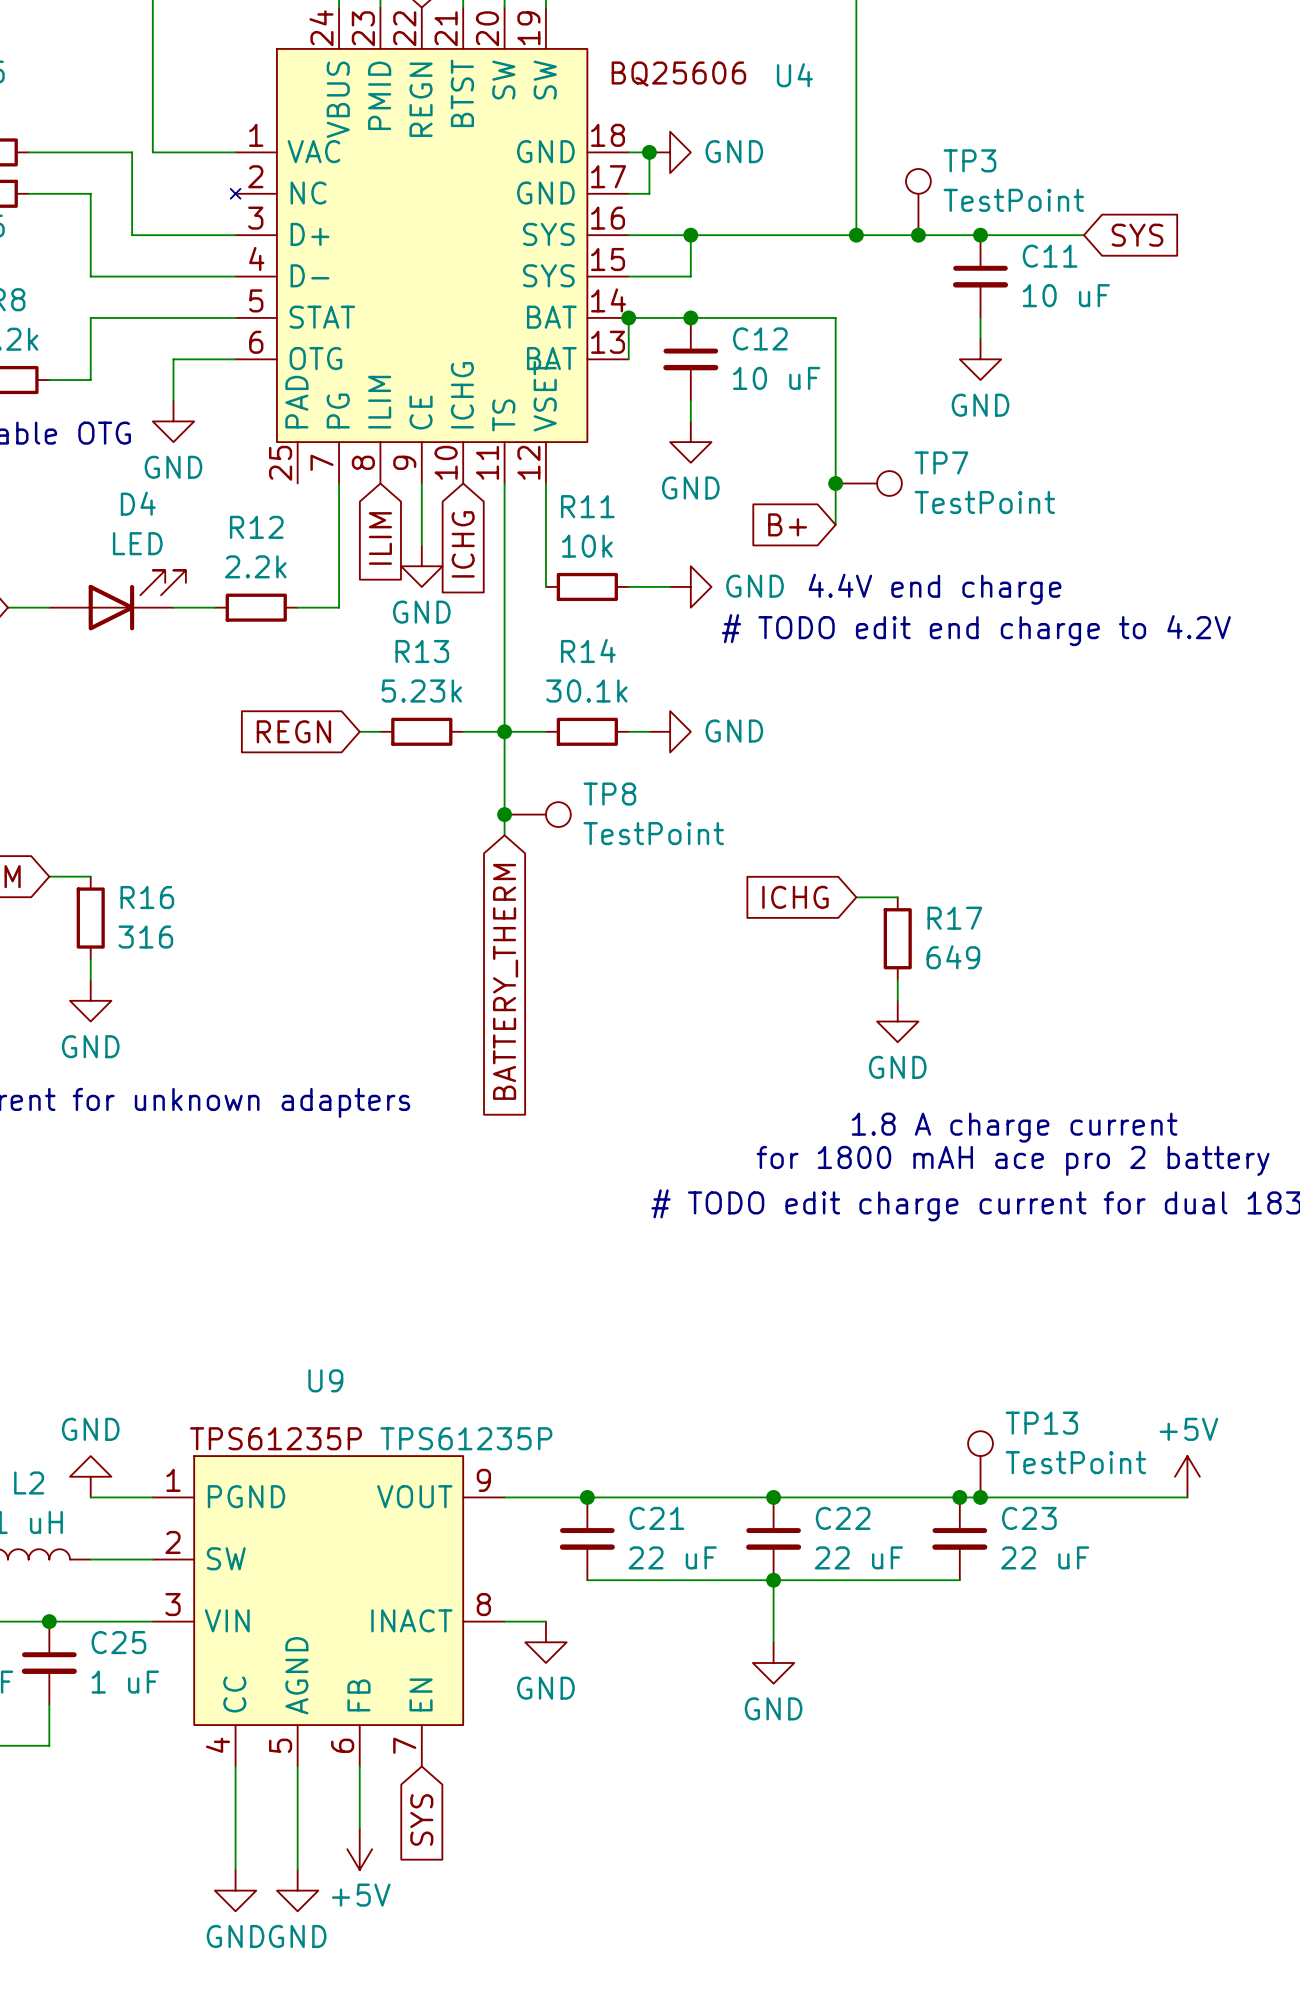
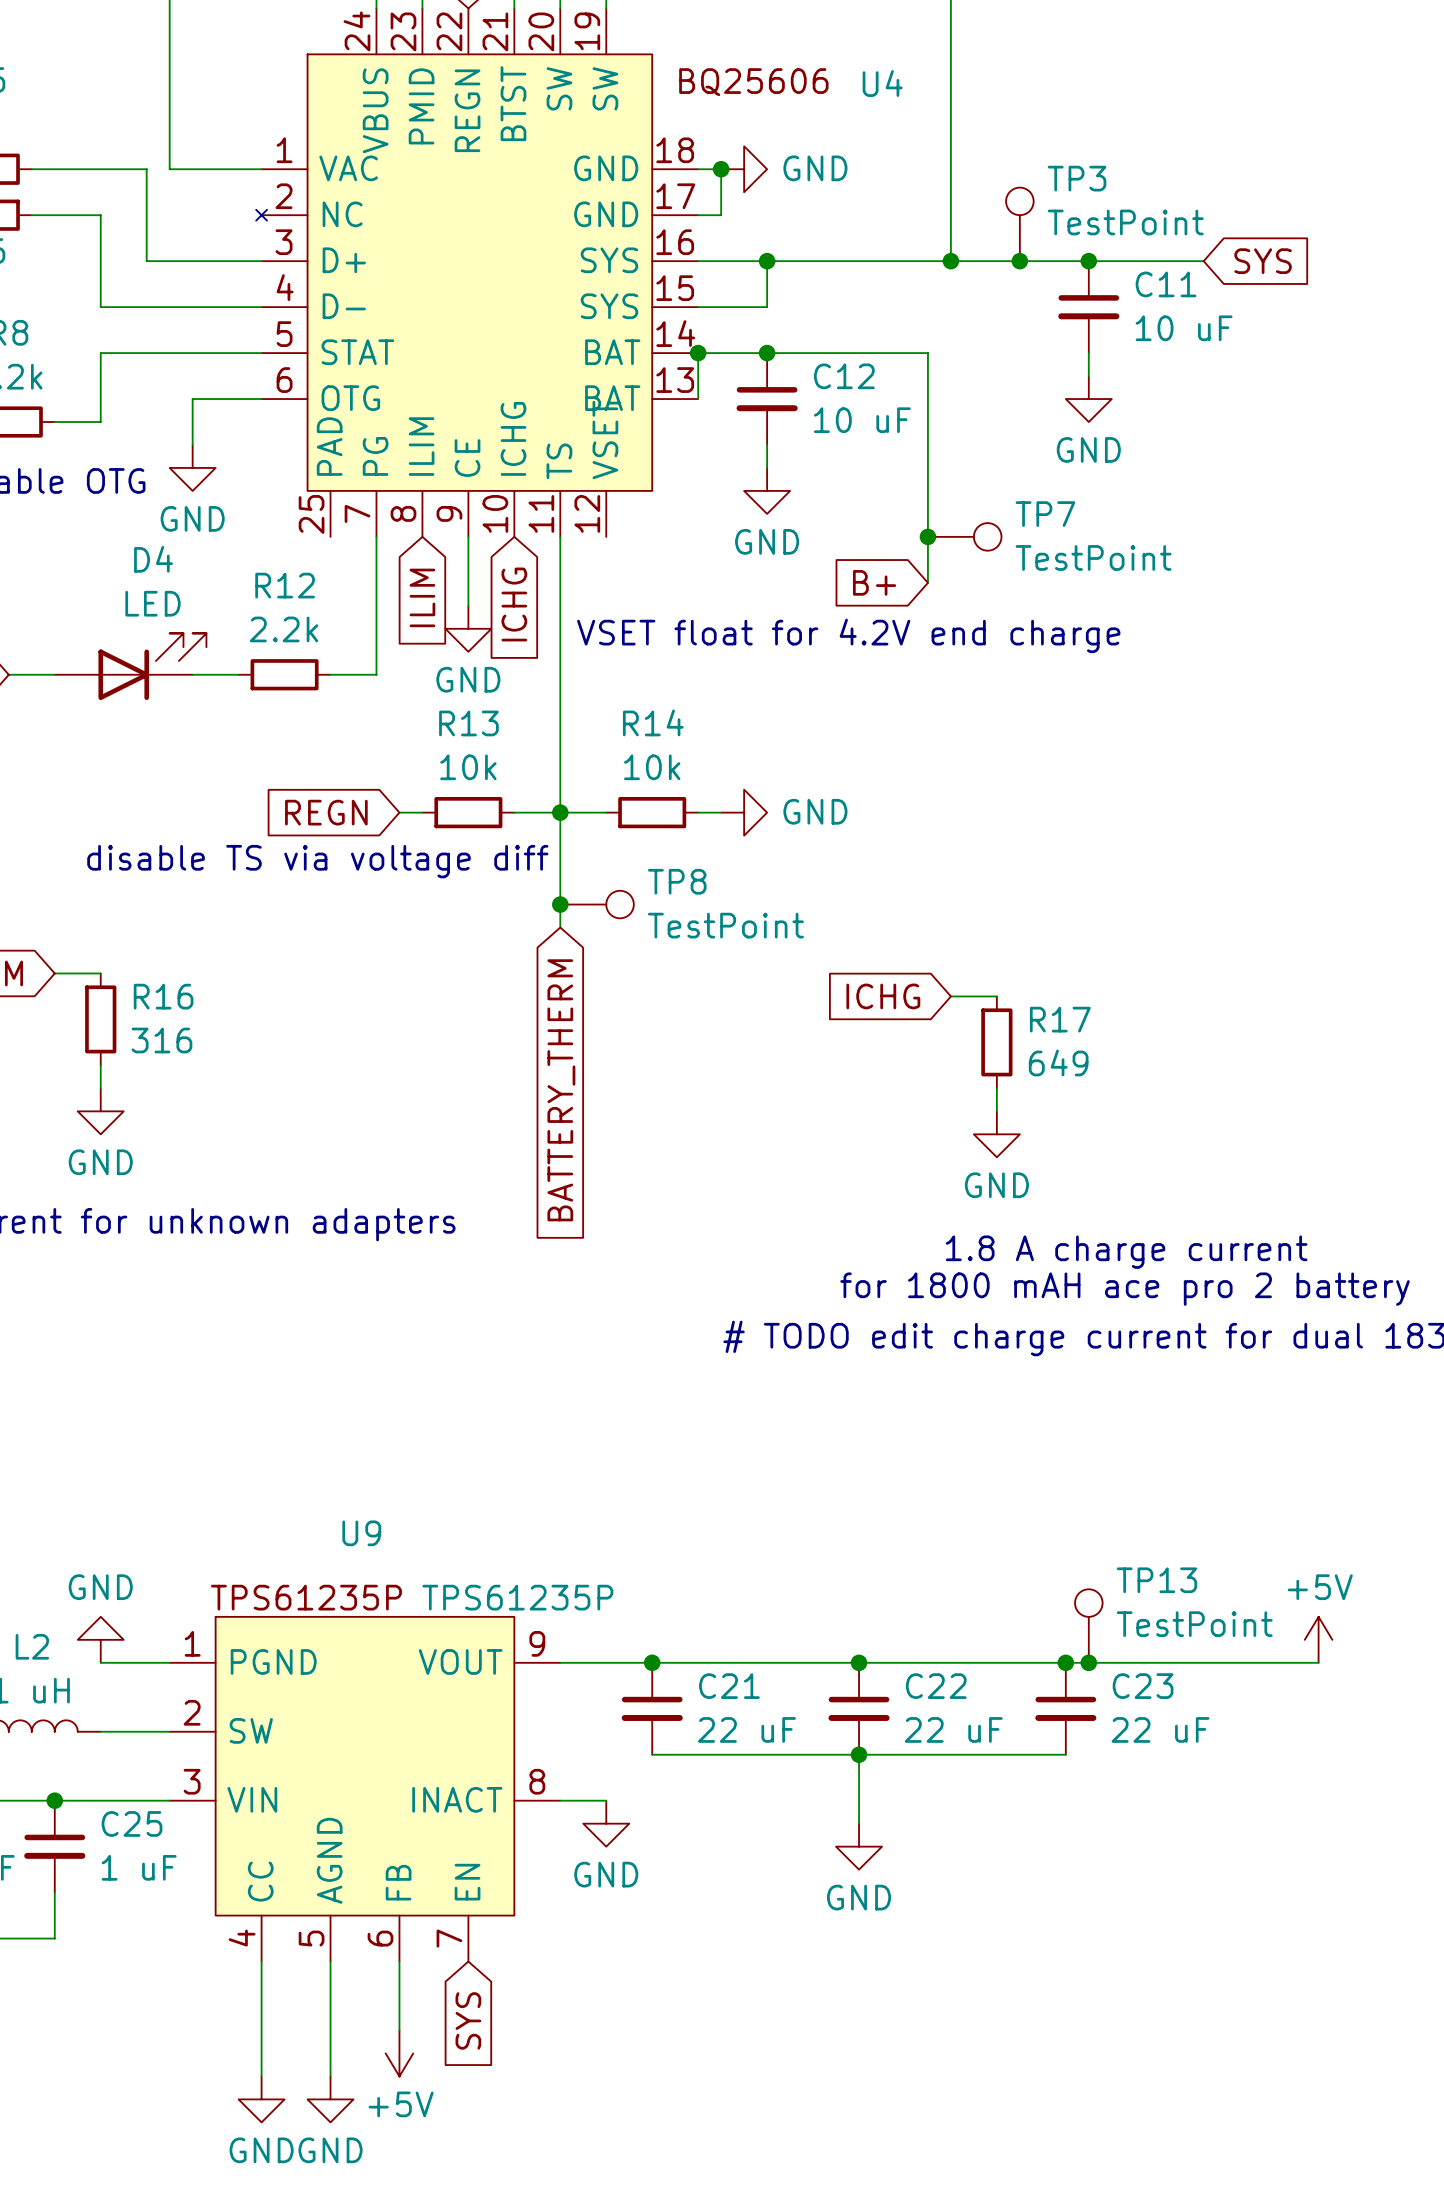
wire: (545, 483) (545, 586) -> none
R11: 10k (587, 586) -> none
wire: (628, 586) (670, 586) -> none
power symbol: GND (690, 586) -> none
text: 4.4V end charge (934, 589) -> VSET float for 4.2V end charge (848, 635)
text: # TODO edit end charge to 4.2V (976, 630) -> none
R13 value: 5.23k (421, 691) -> 10k (468, 767)
R14 value: 30.1k (586, 691) -> 10k (652, 767)
text: none -> disable TS via voltage diff (317, 861)

